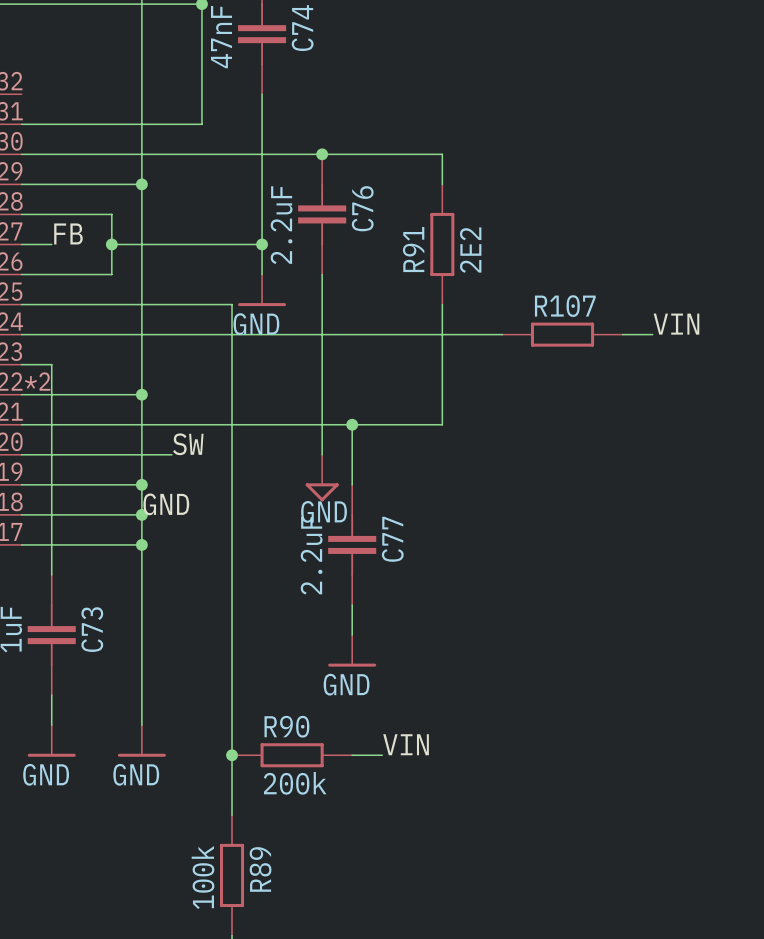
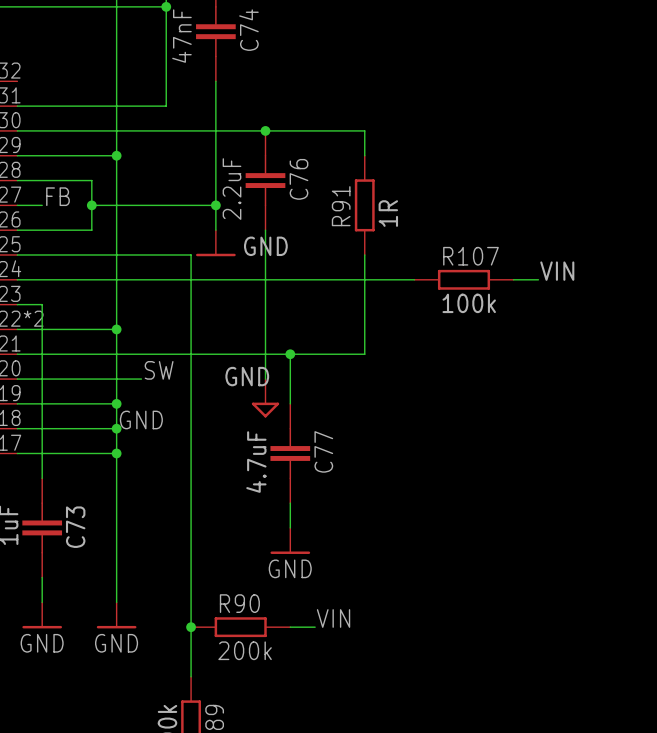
R91 value: 2E2 (470, 250) -> 1R (388, 213)
power symbol text position: GND (256, 324) -> GND (265, 246)
R107 value: none -> 100k (469, 303)
power symbol text position: GND (324, 511) -> GND (247, 376)
C77 value: 2.2uF (311, 555) -> 4.7uF (256, 462)

